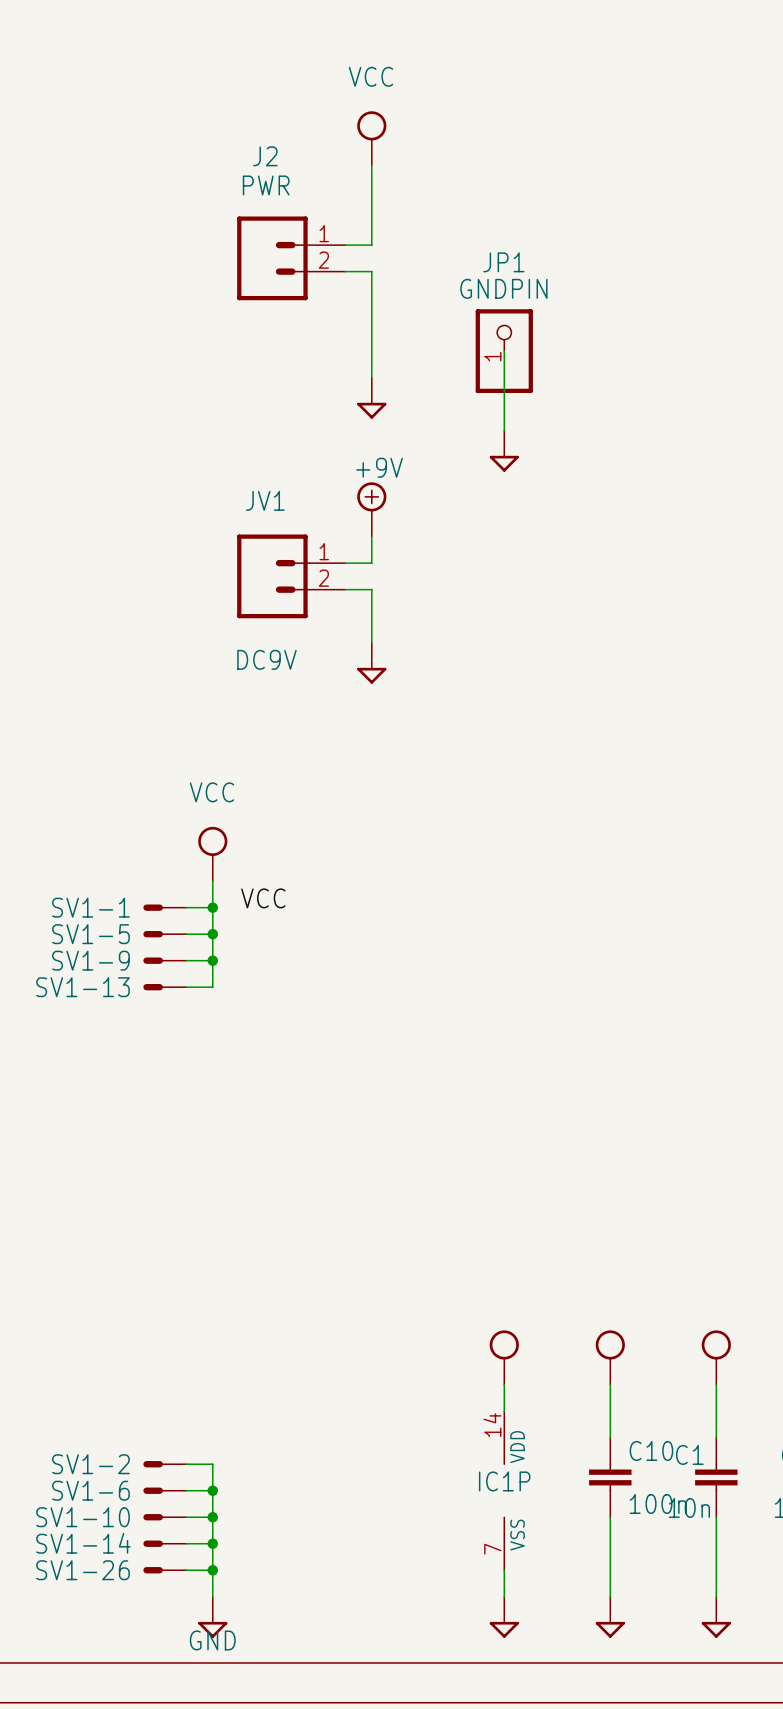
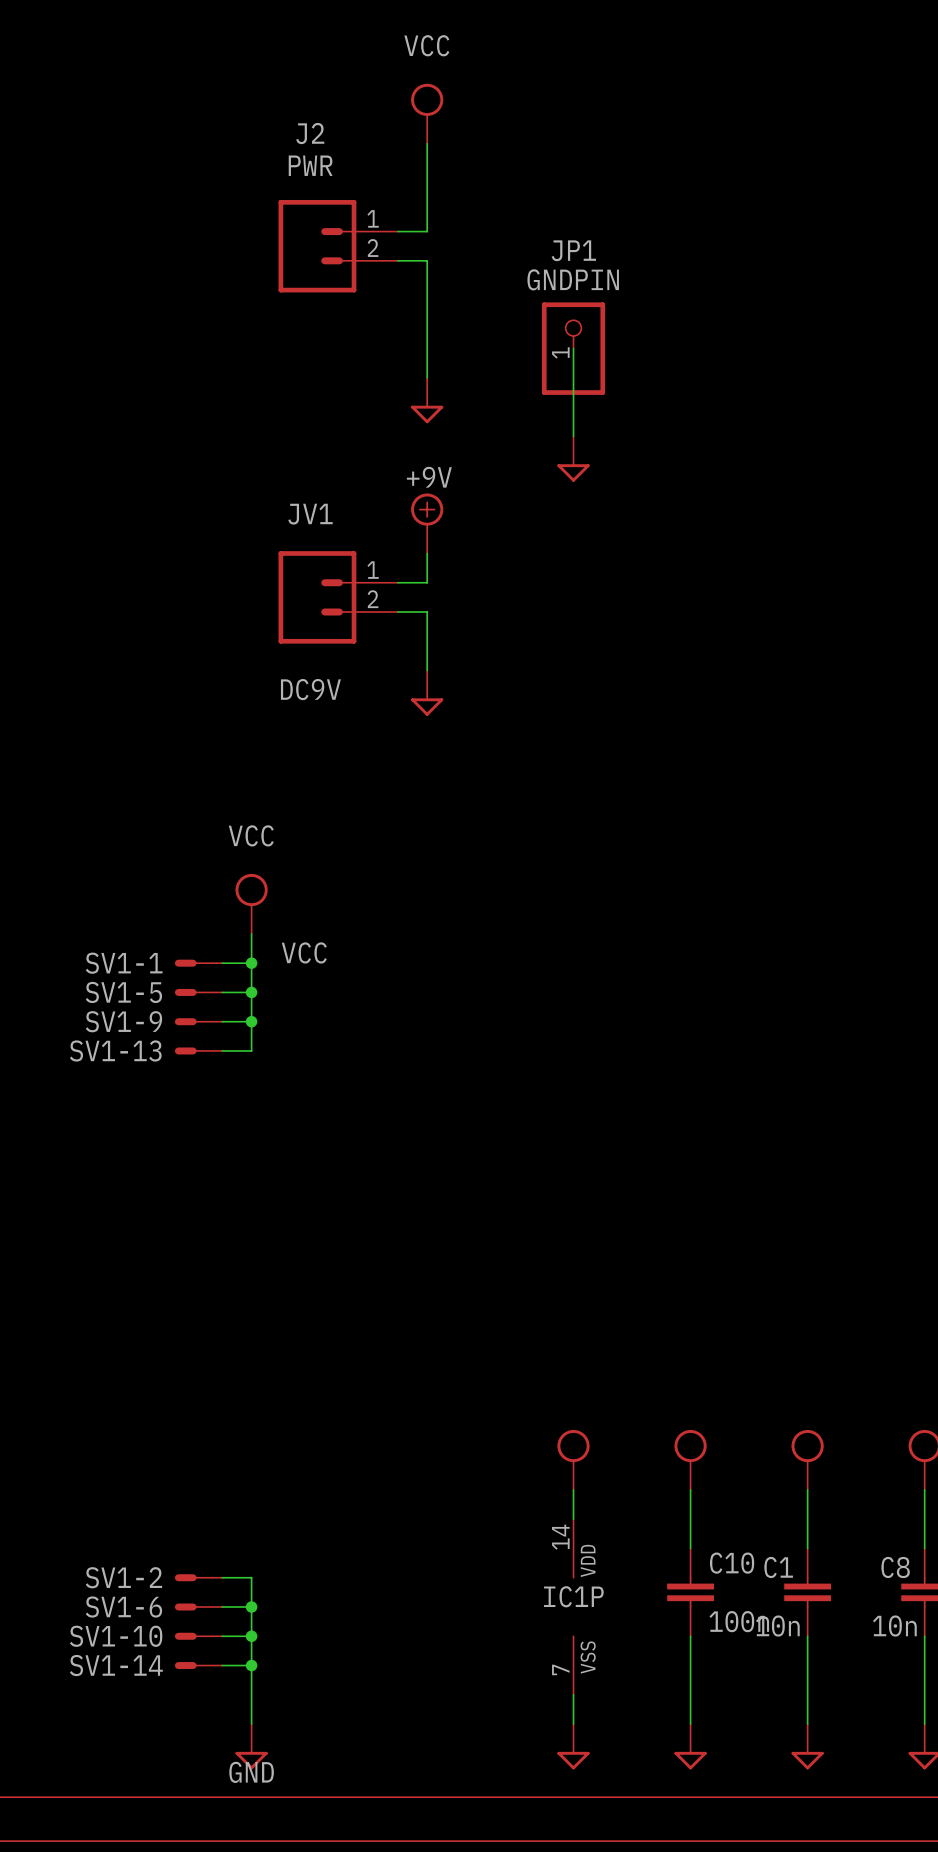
SV1-26: (164, 1570) -> none
wire: (186, 1570) (212, 1570) -> none
junction: (212, 1570) -> none

